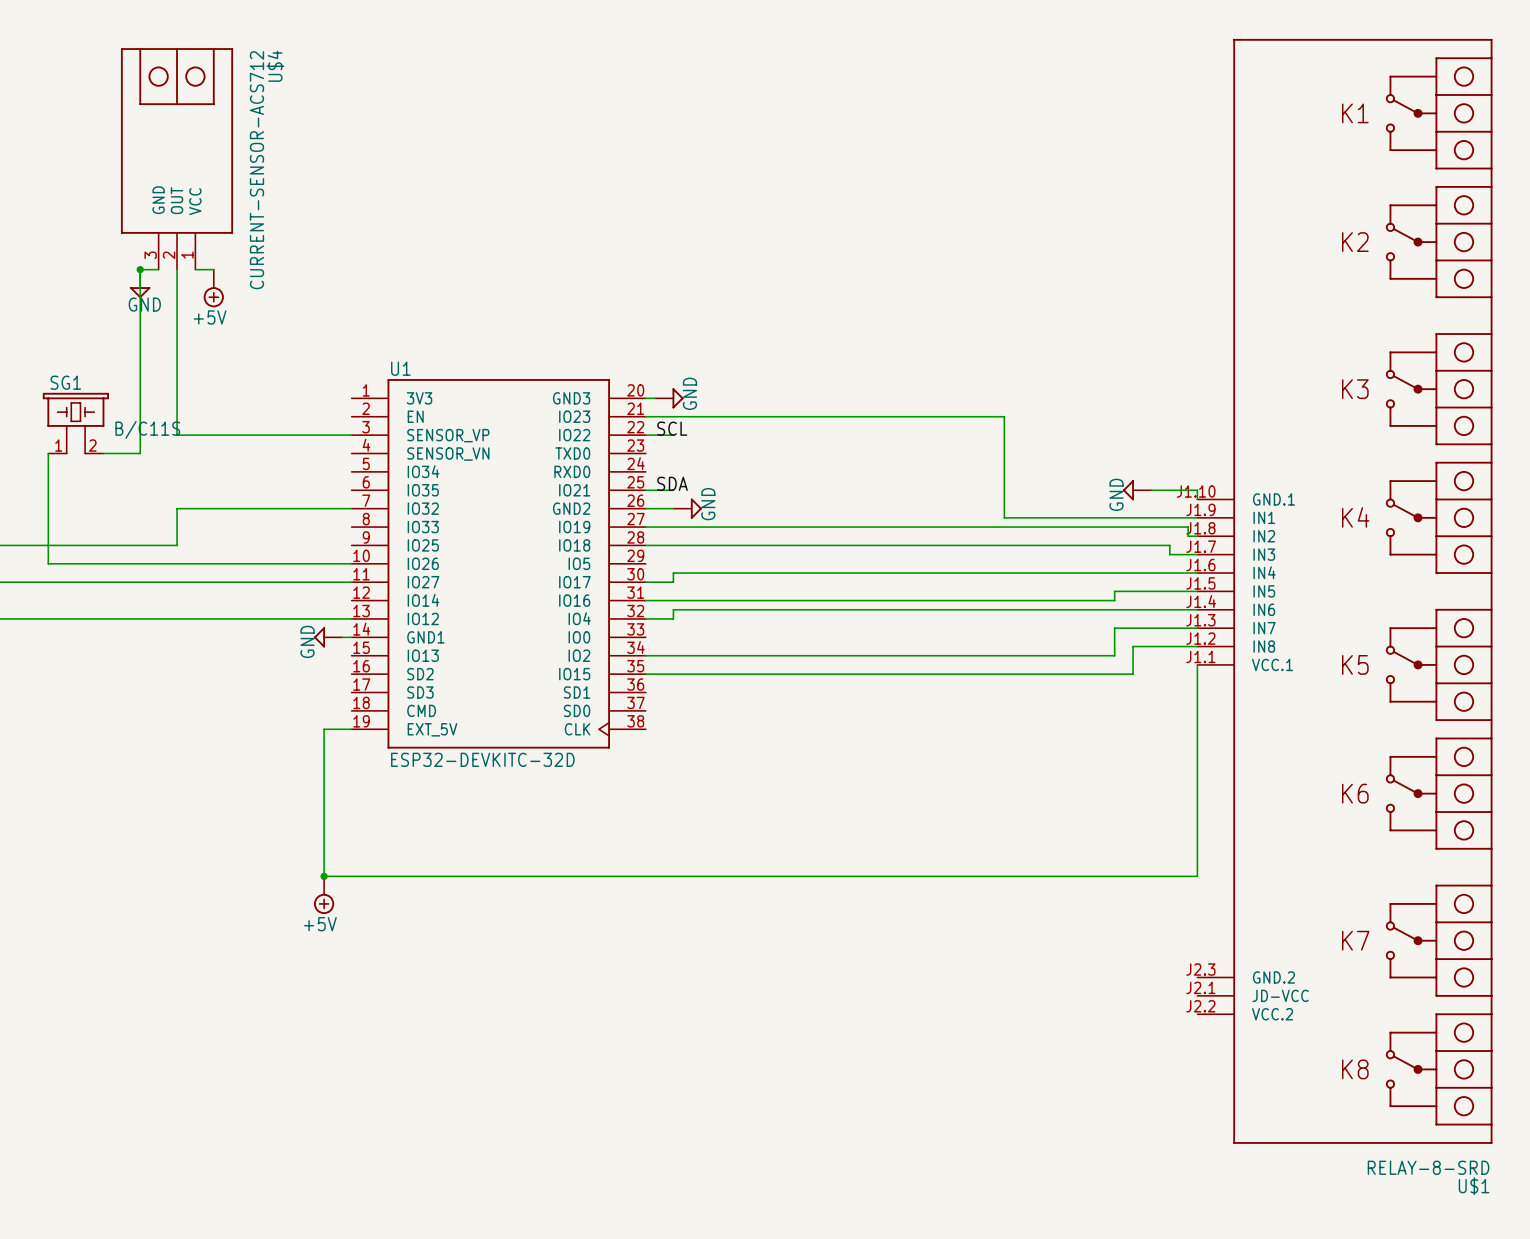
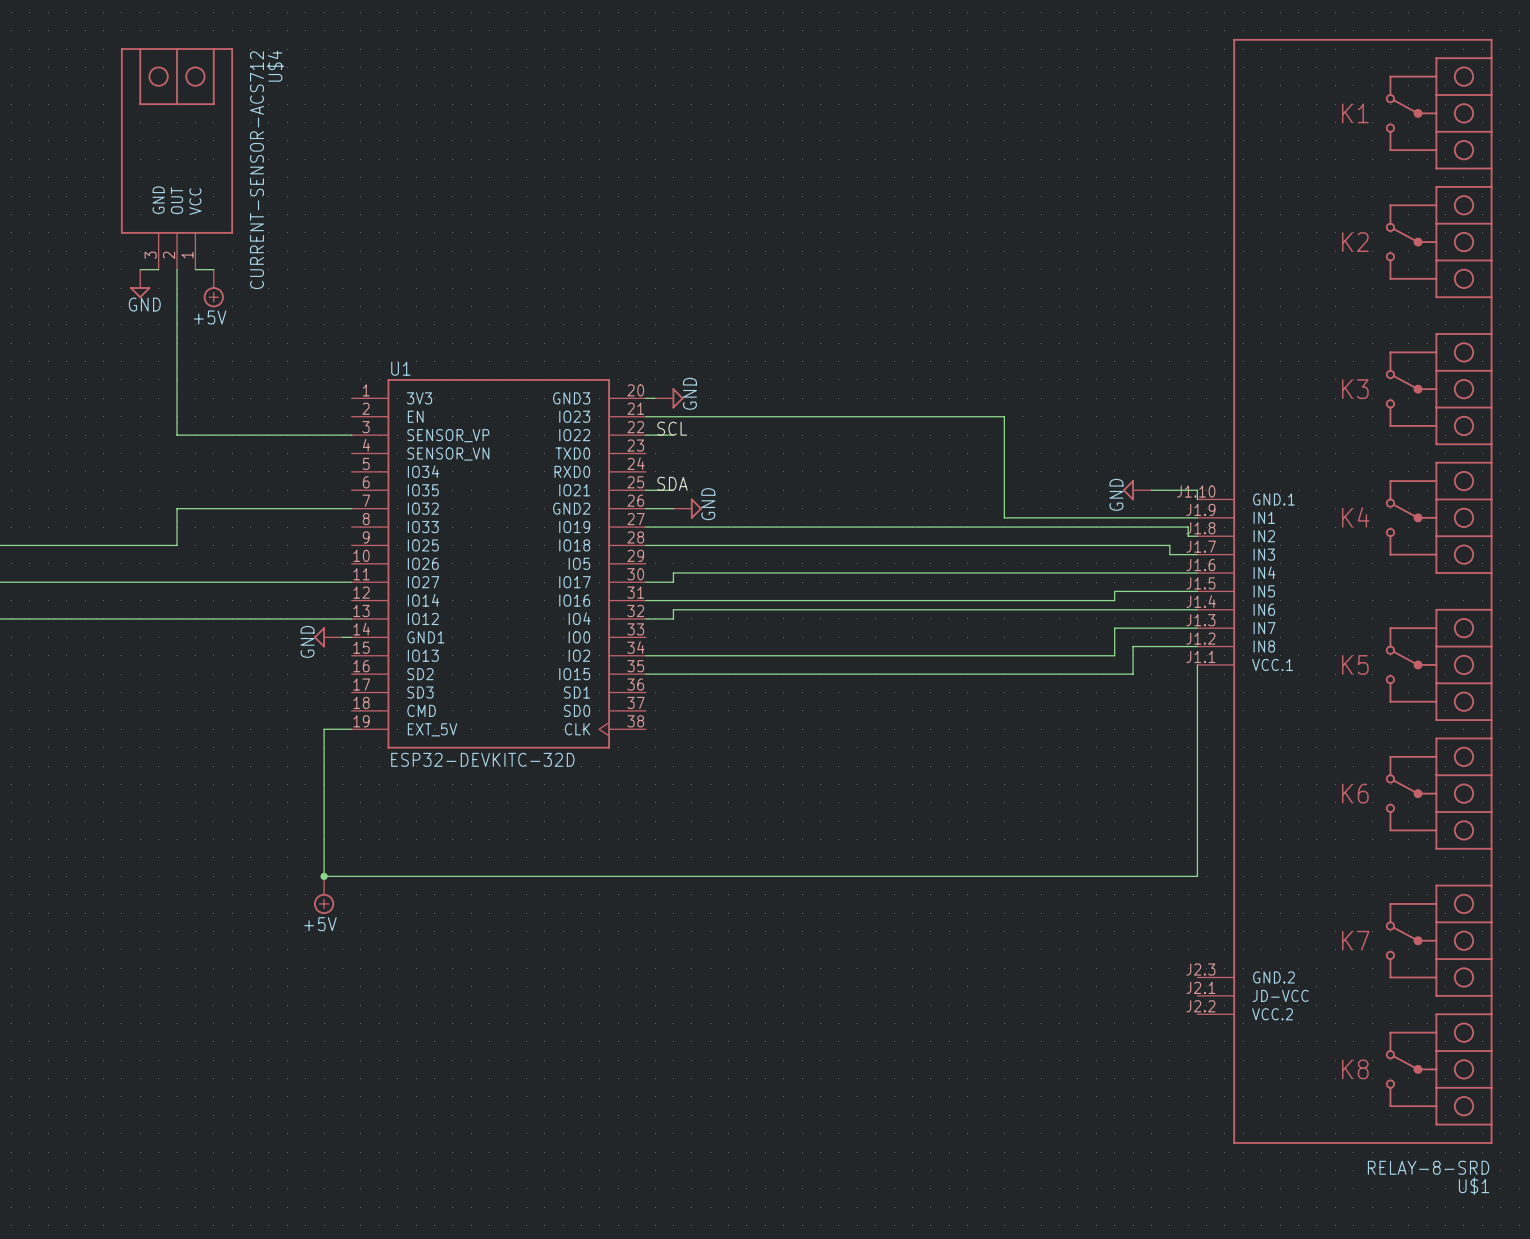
wire: (140, 269) (140, 453) (103, 453) -> none
junction: (140, 269) -> none
SG1: B/C11S (75, 423) -> none
wire: (48, 453) (48, 563) (351, 563) -> none

